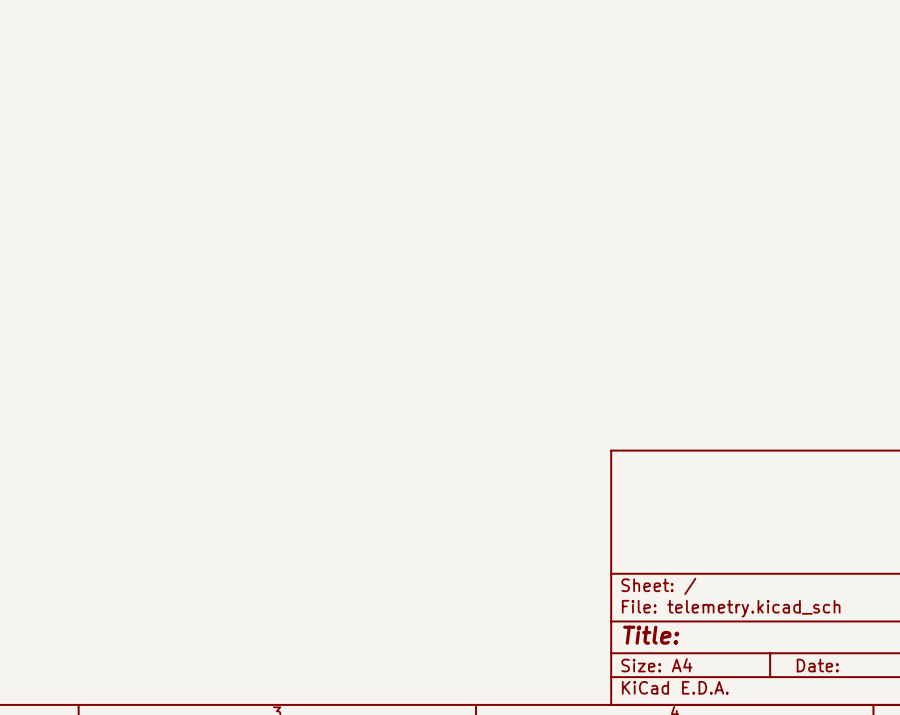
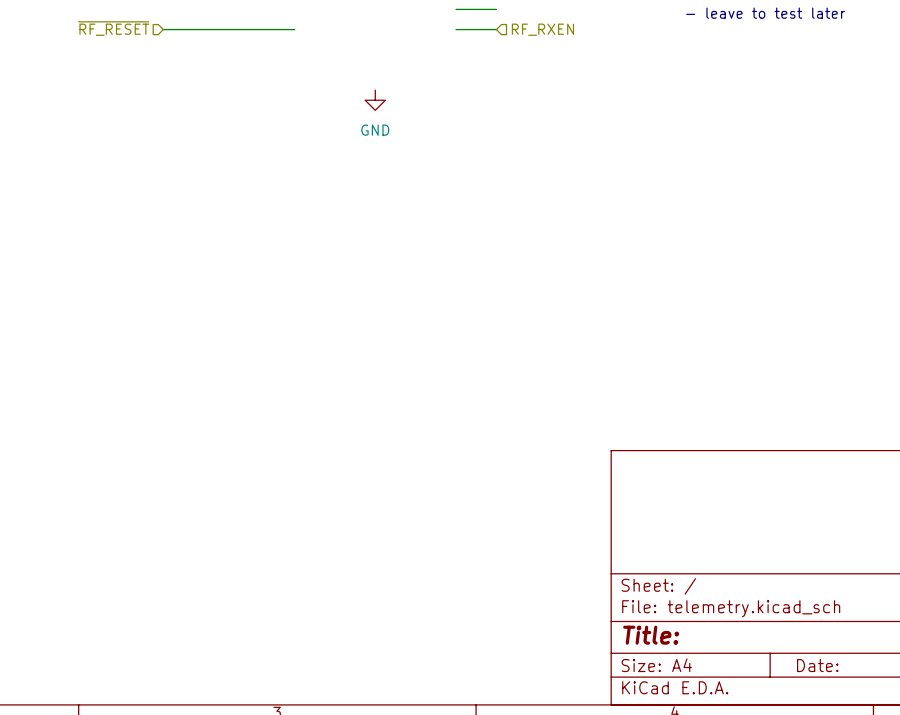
wire: none -> (456, 9) (496, 9)
text: none -> - leave to test later (765, 13)
hierarchical label: none -> ~{RF_RESET} (113, 28)
wire: none -> (163, 29) (294, 29)
wire: none -> (456, 29) (496, 29)
hierarchical label: none -> RF_RXEN (542, 29)
power symbol: none -> GND (375, 100)

